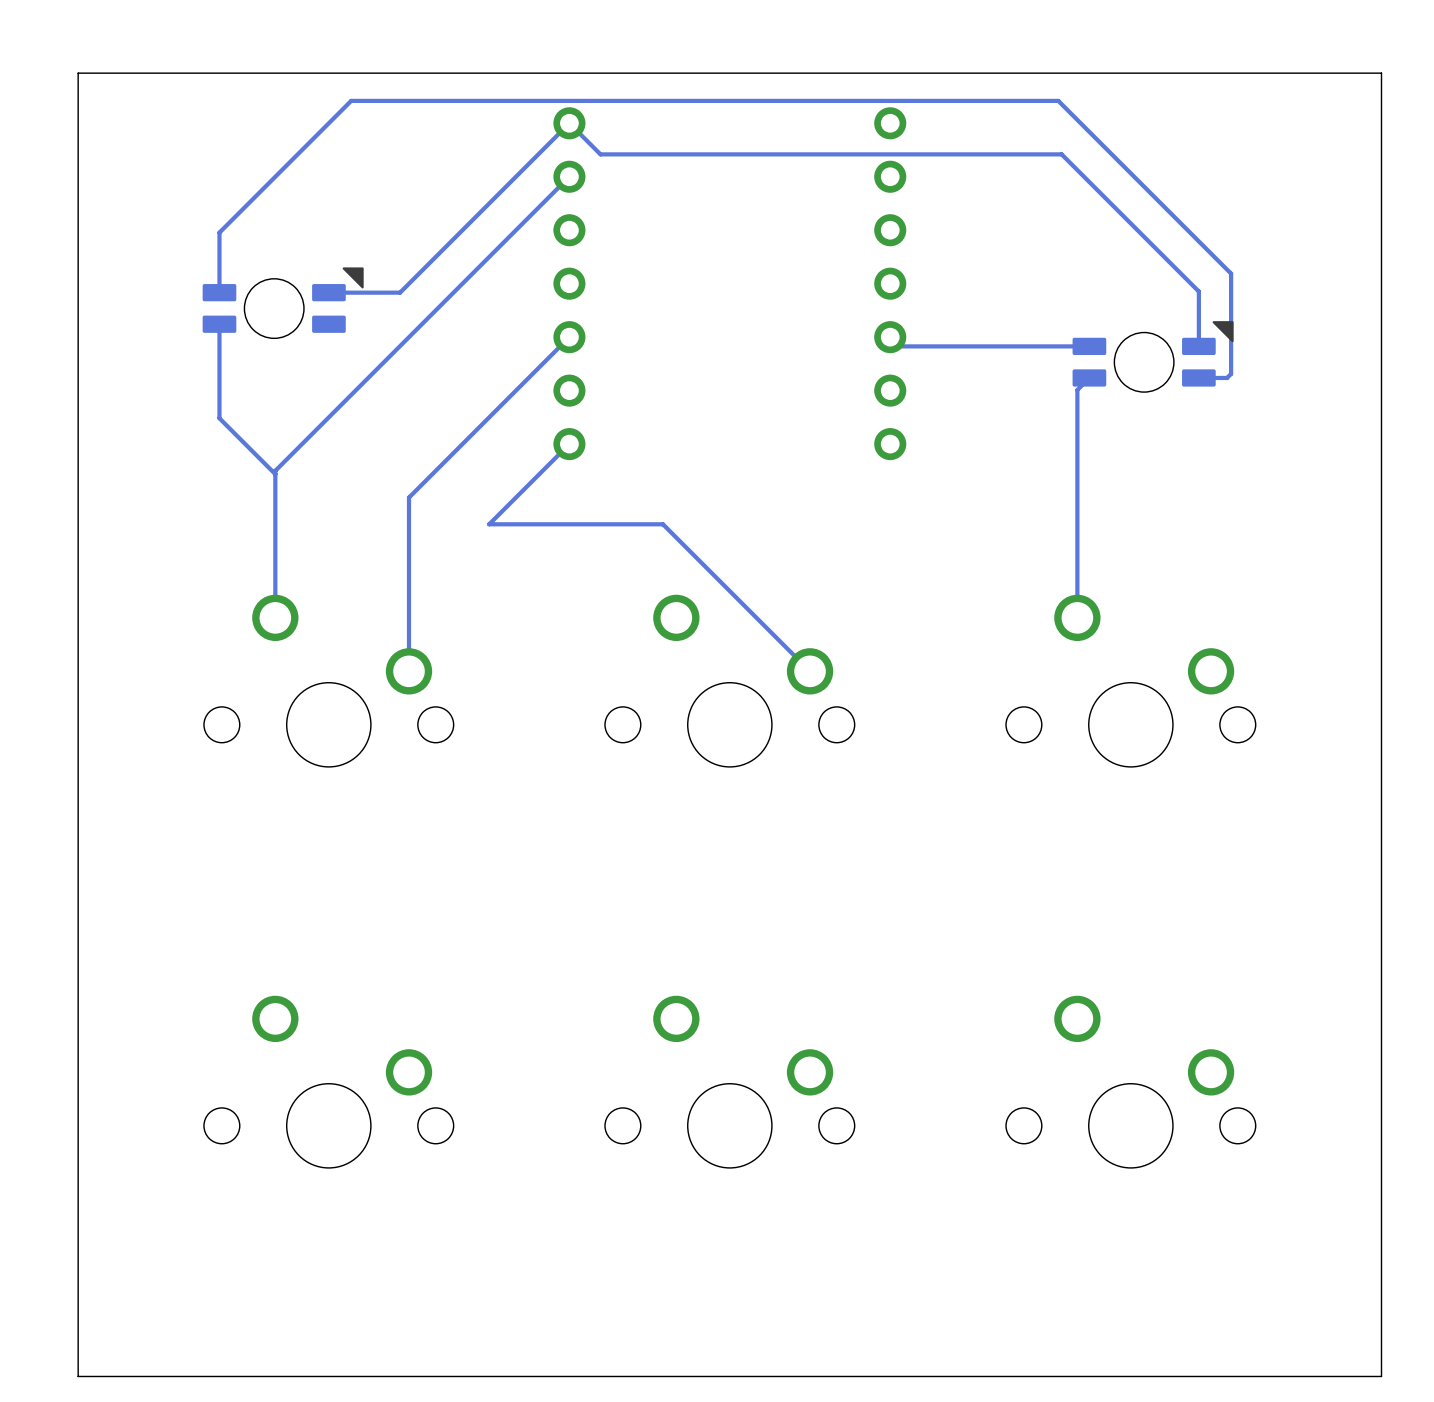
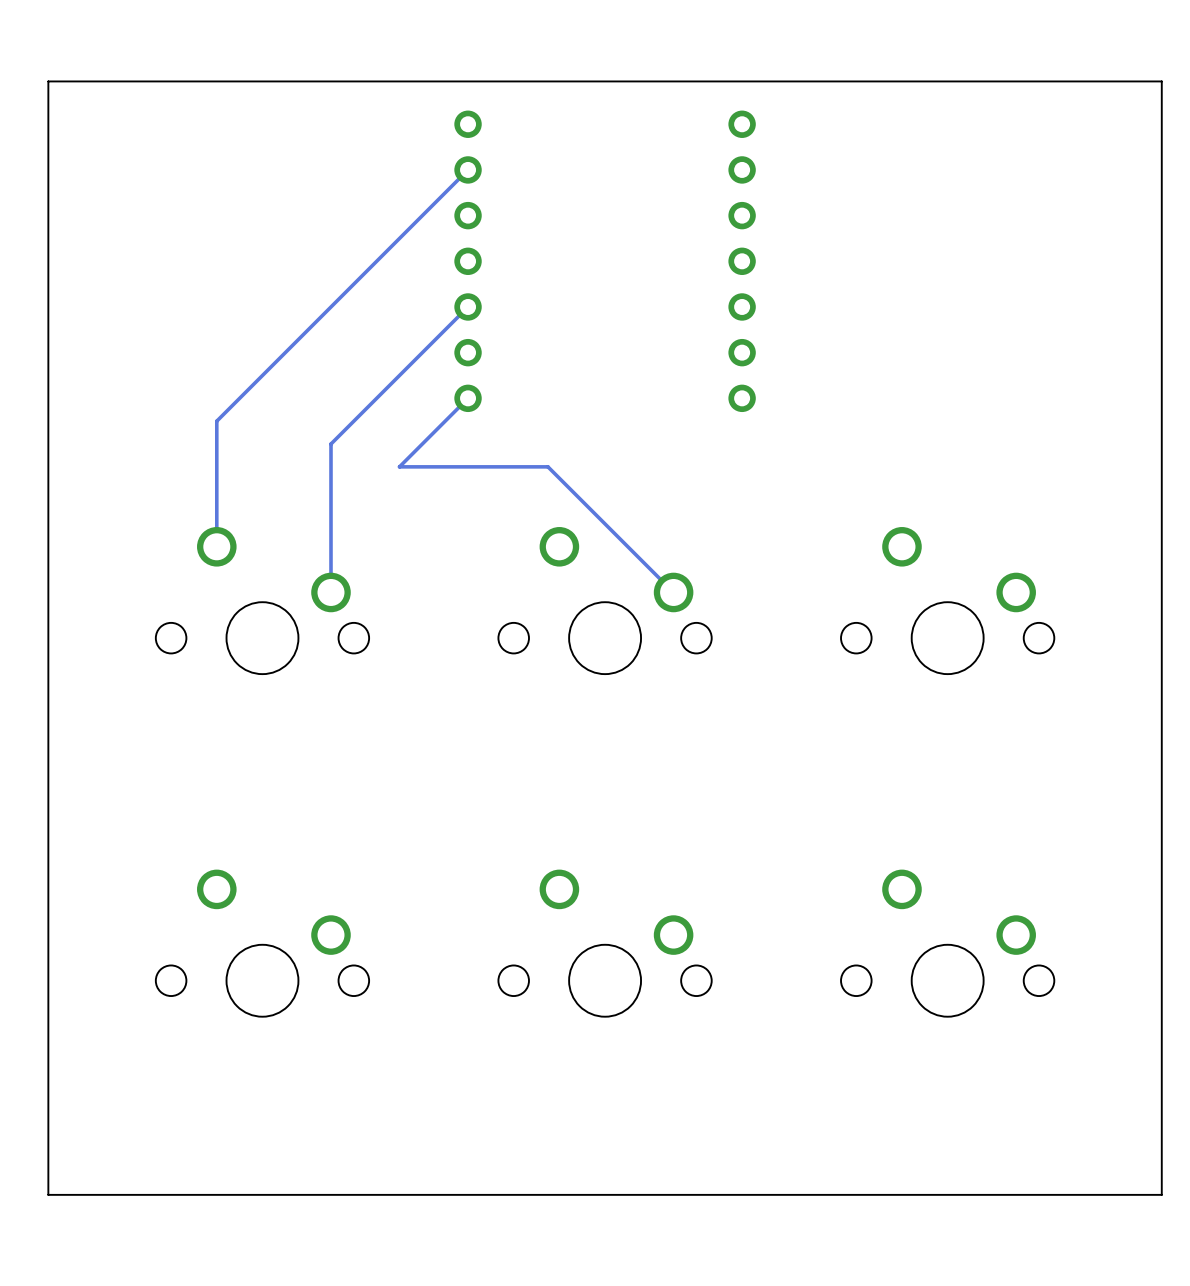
track: (219, 292) (219, 232) (351, 100) (1058, 100) (1231, 273) (1231, 373) (1227, 377) (1198, 377) -> none
track: (328, 292) (400, 292) (569, 123) (600, 154) (1061, 154) (1198, 291) (1198, 346) -> none
part: (283, 303) -> none
track: (222, 329) (219, 324) (219, 418) (275, 474) -> none
track: (890, 337) (899, 346) (1089, 346) -> none
part: (1153, 356) -> none
track: (1089, 377) (1077, 389) (1077, 617) -> none

